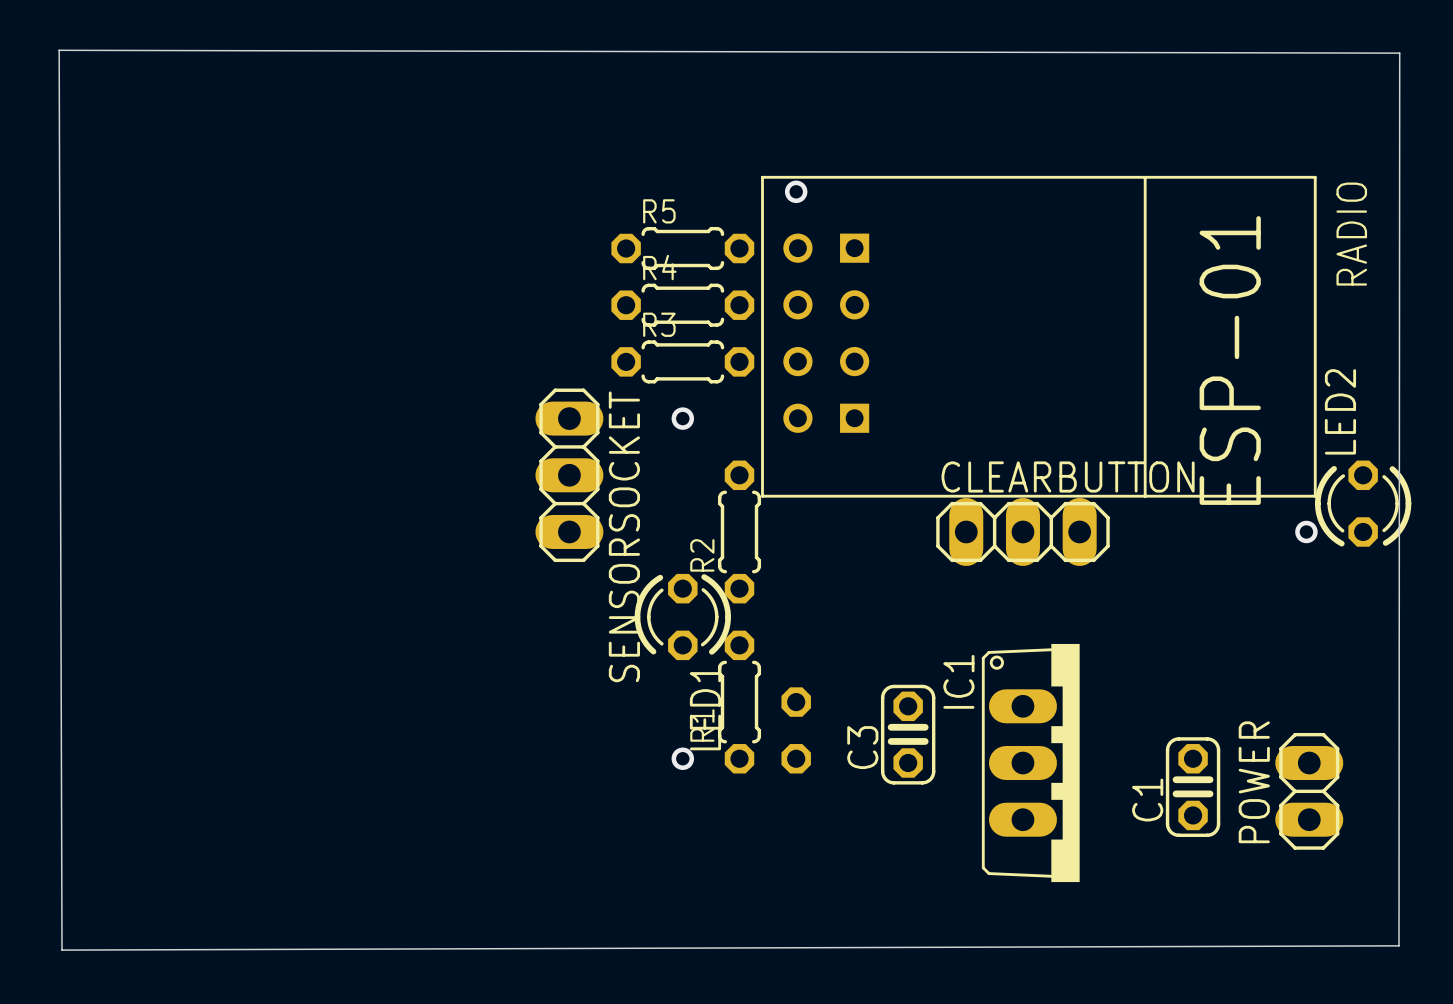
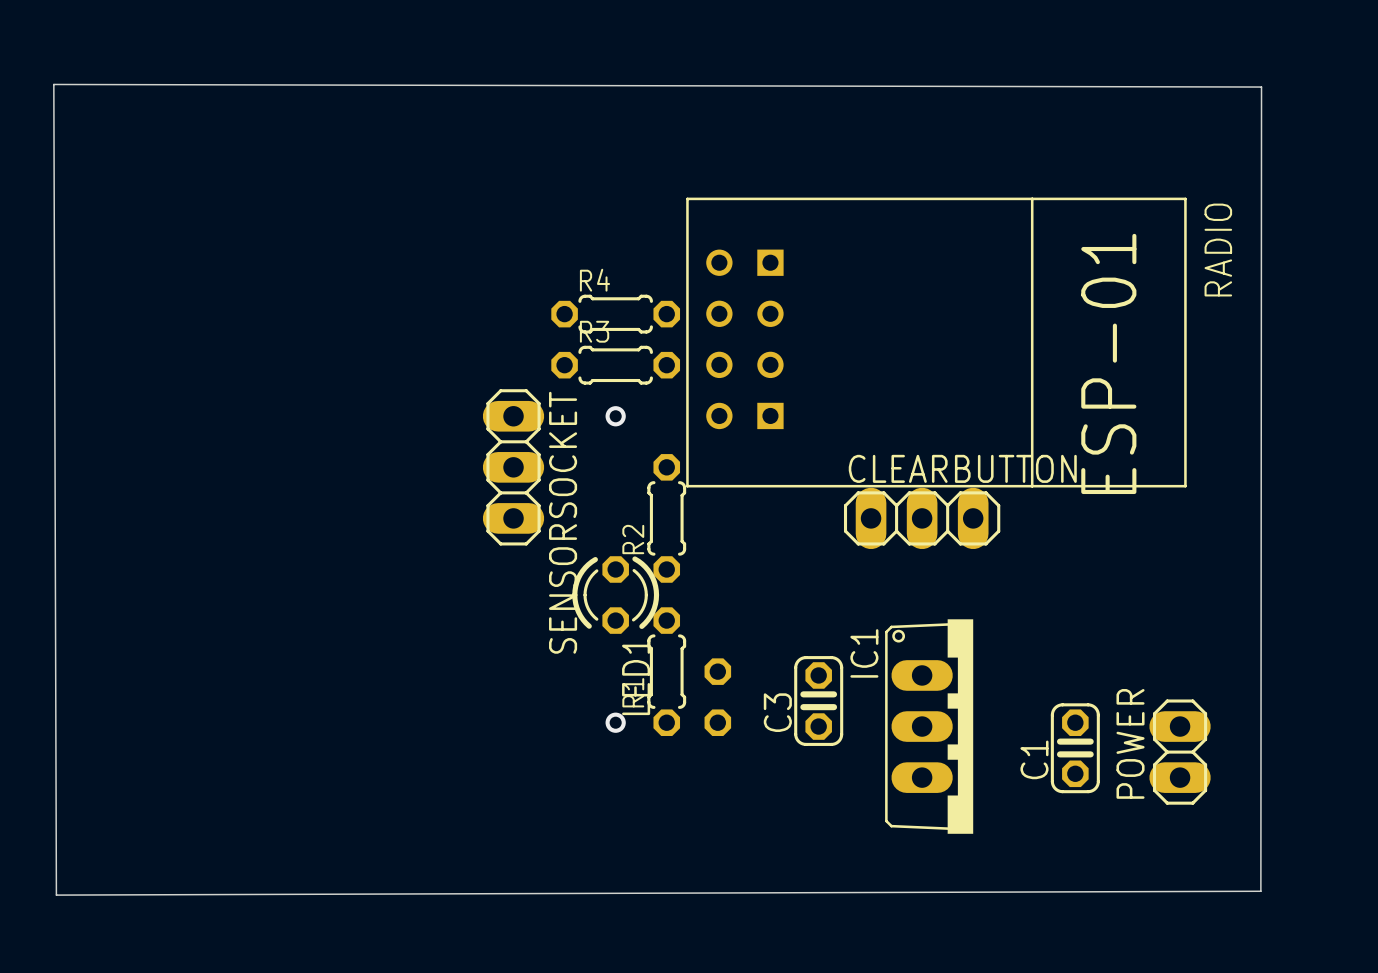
via: (796, 191) -> none
R5: (682, 248) -> none
LED2: (1363, 503) -> none
via: (1306, 531) -> none

